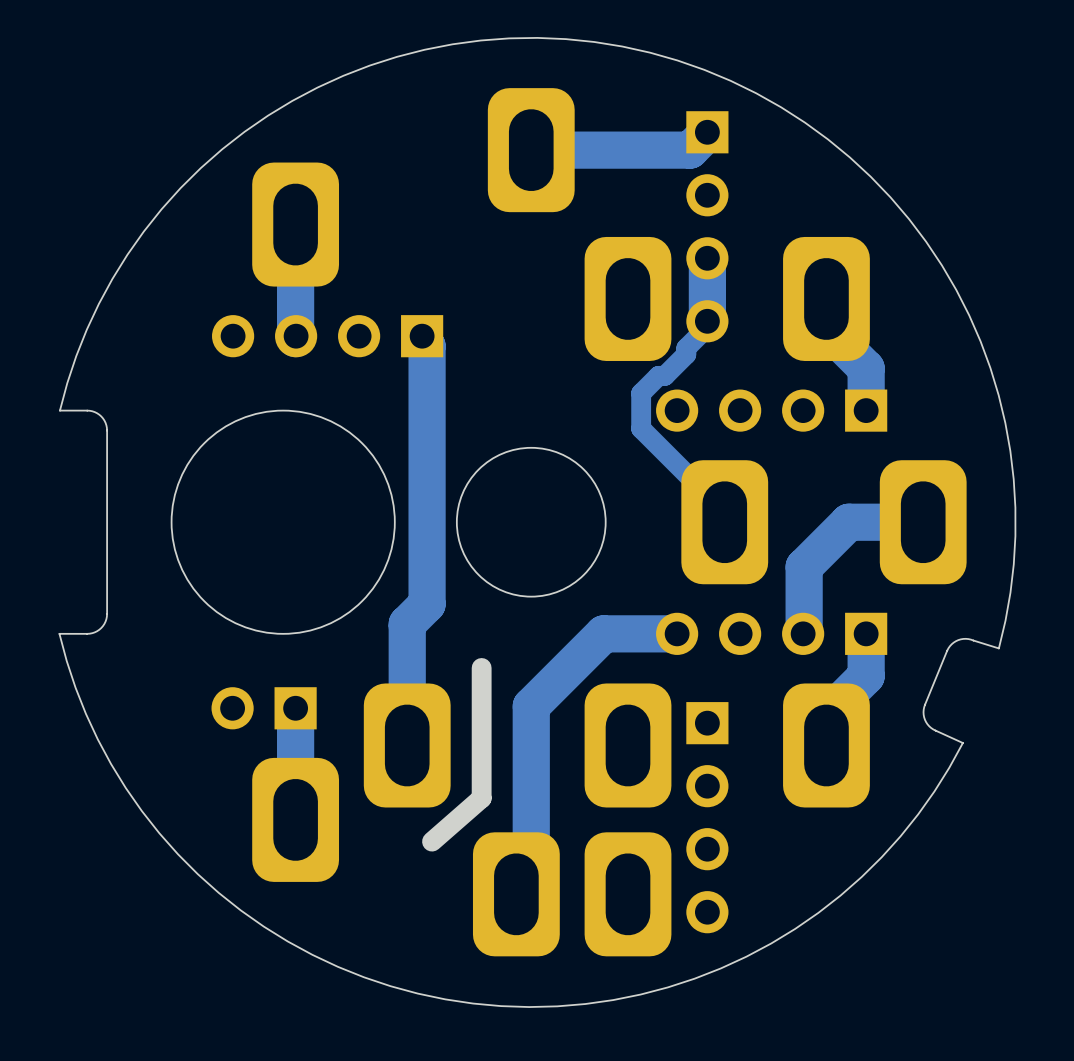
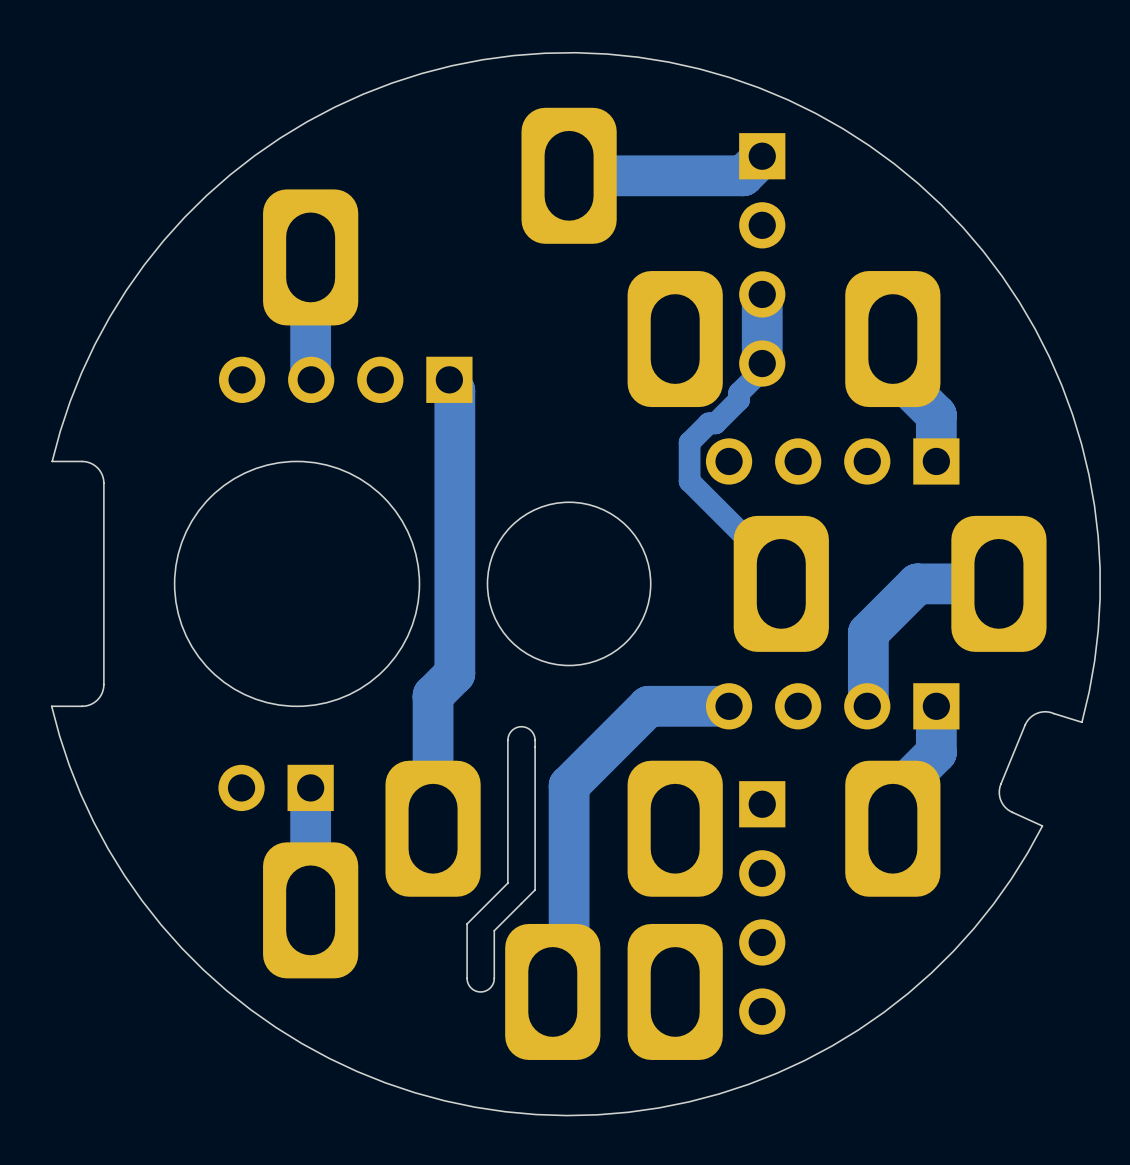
board edge: none -> (535, 740) (535, 889) (494, 930) (493, 981) (487, 990) (477, 991) (471, 987) (467, 980) (467, 923) (507, 883) (508, 736) (513, 729) (523, 726) (531, 730) (535, 740)
board edge: (481, 667) (481, 798) (432, 841) -> none

